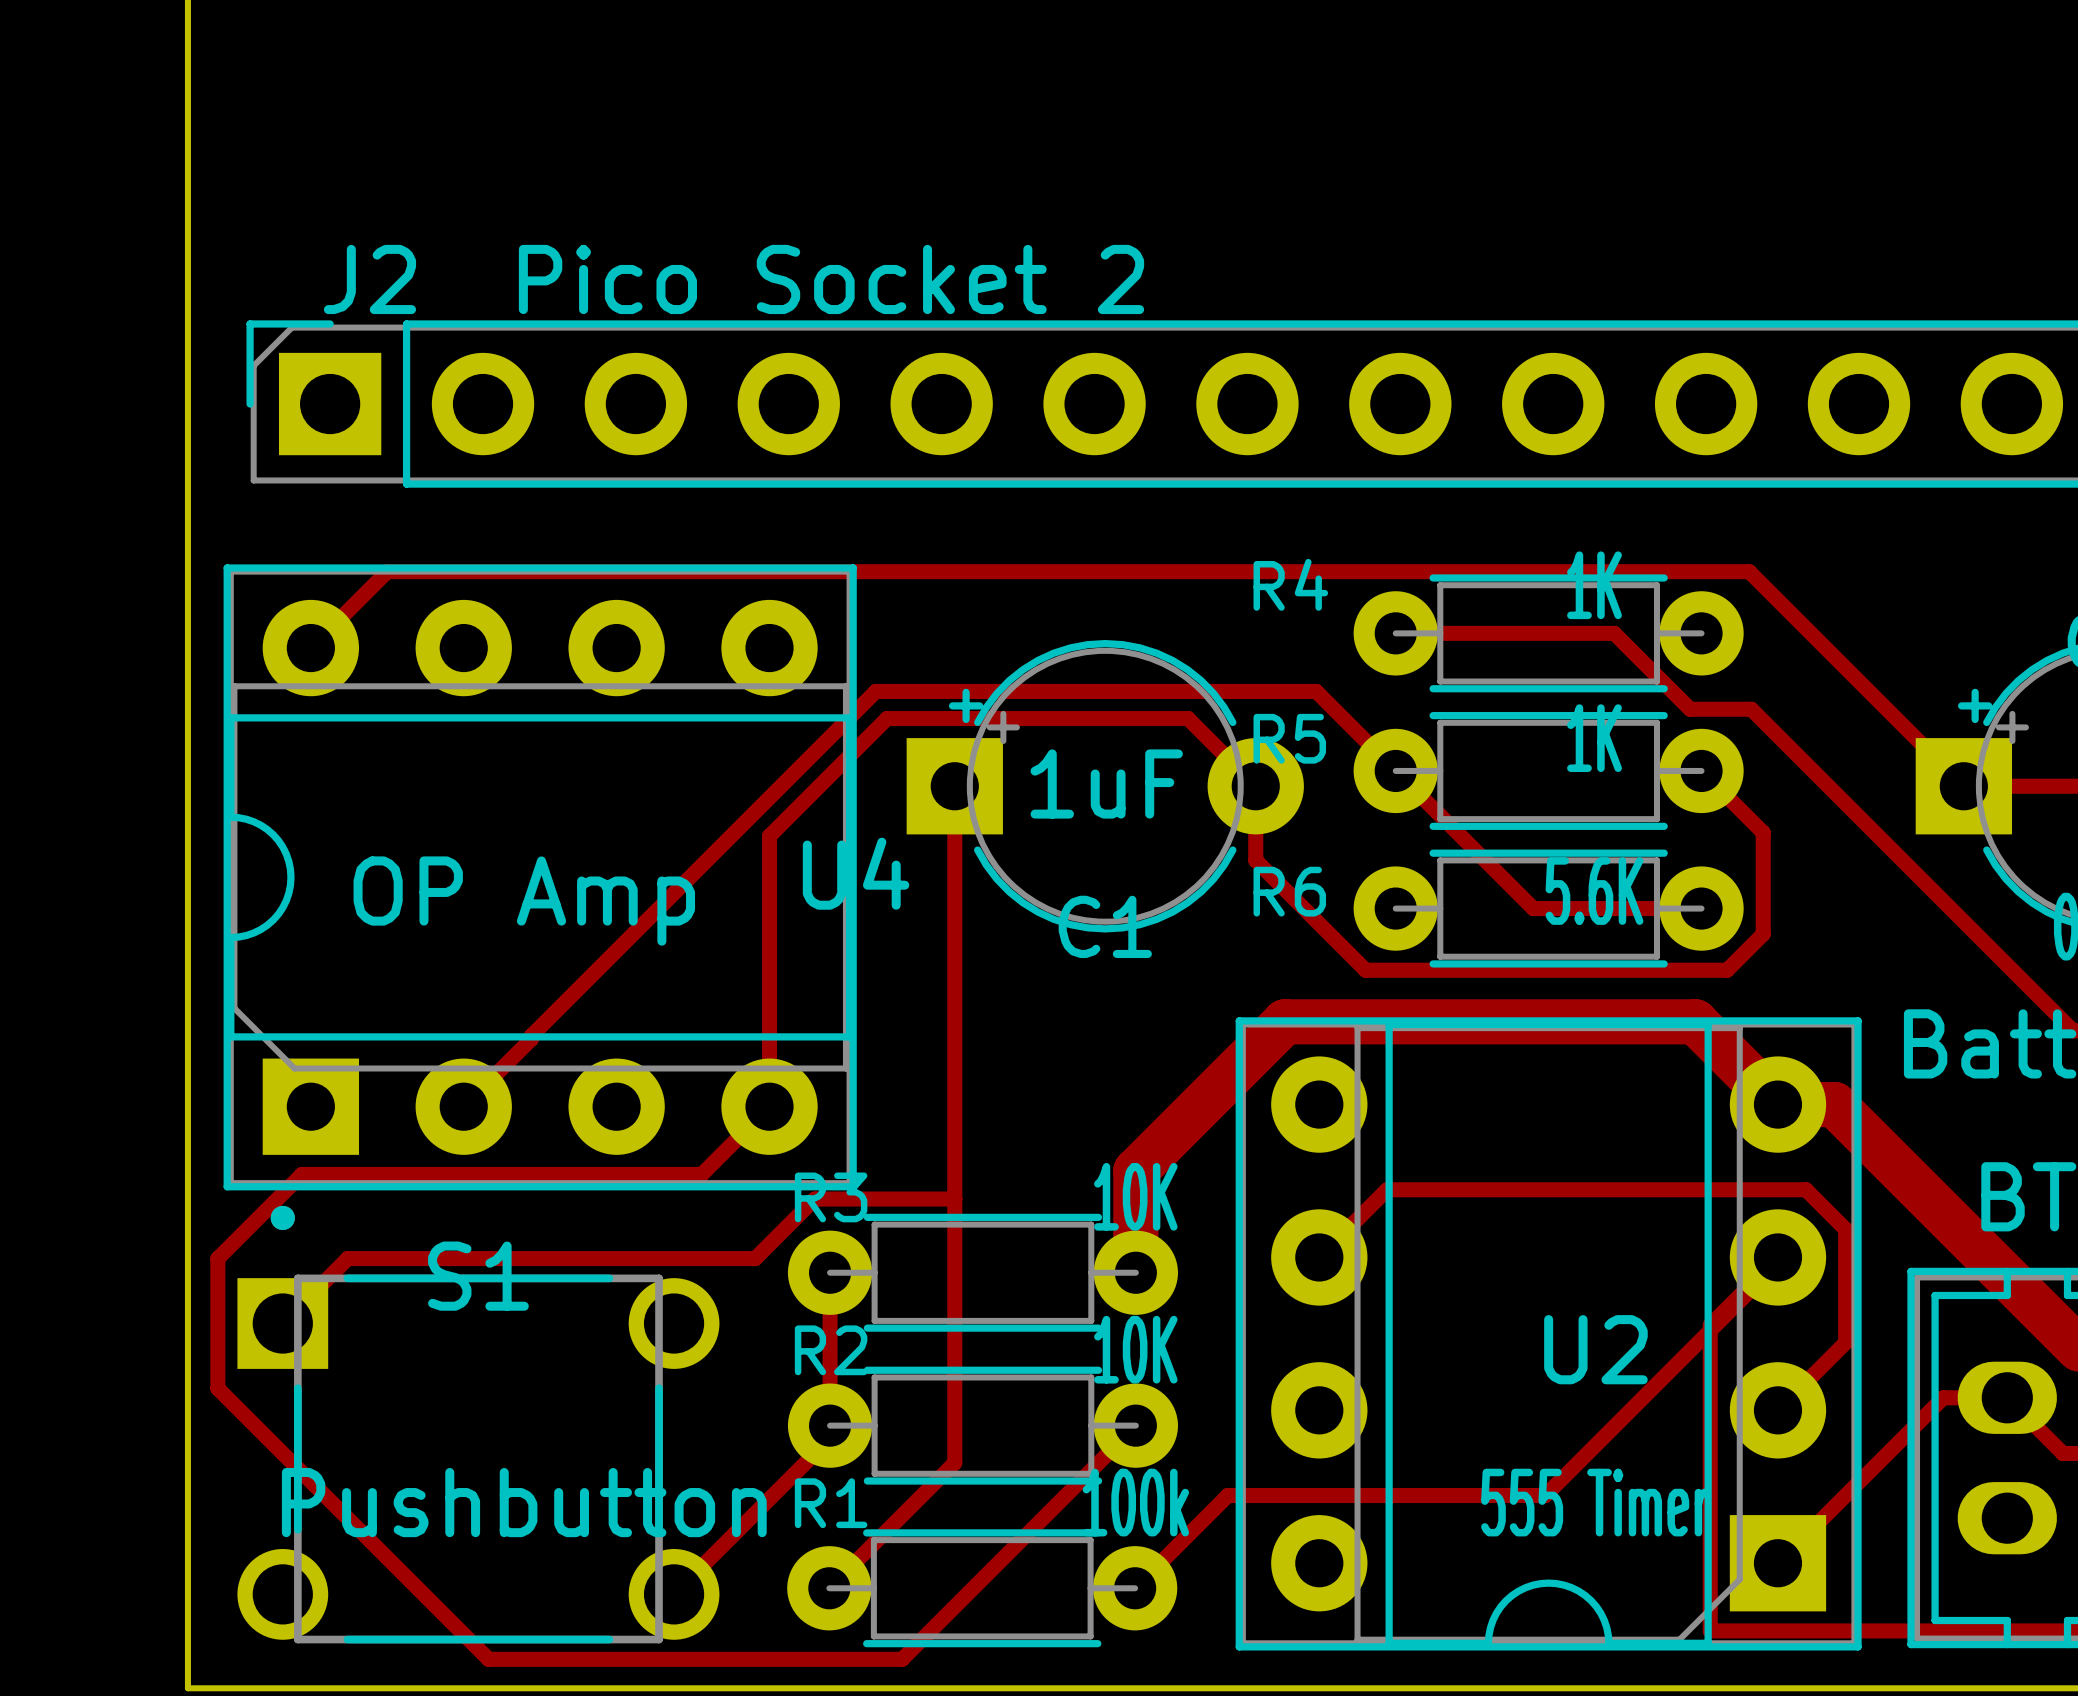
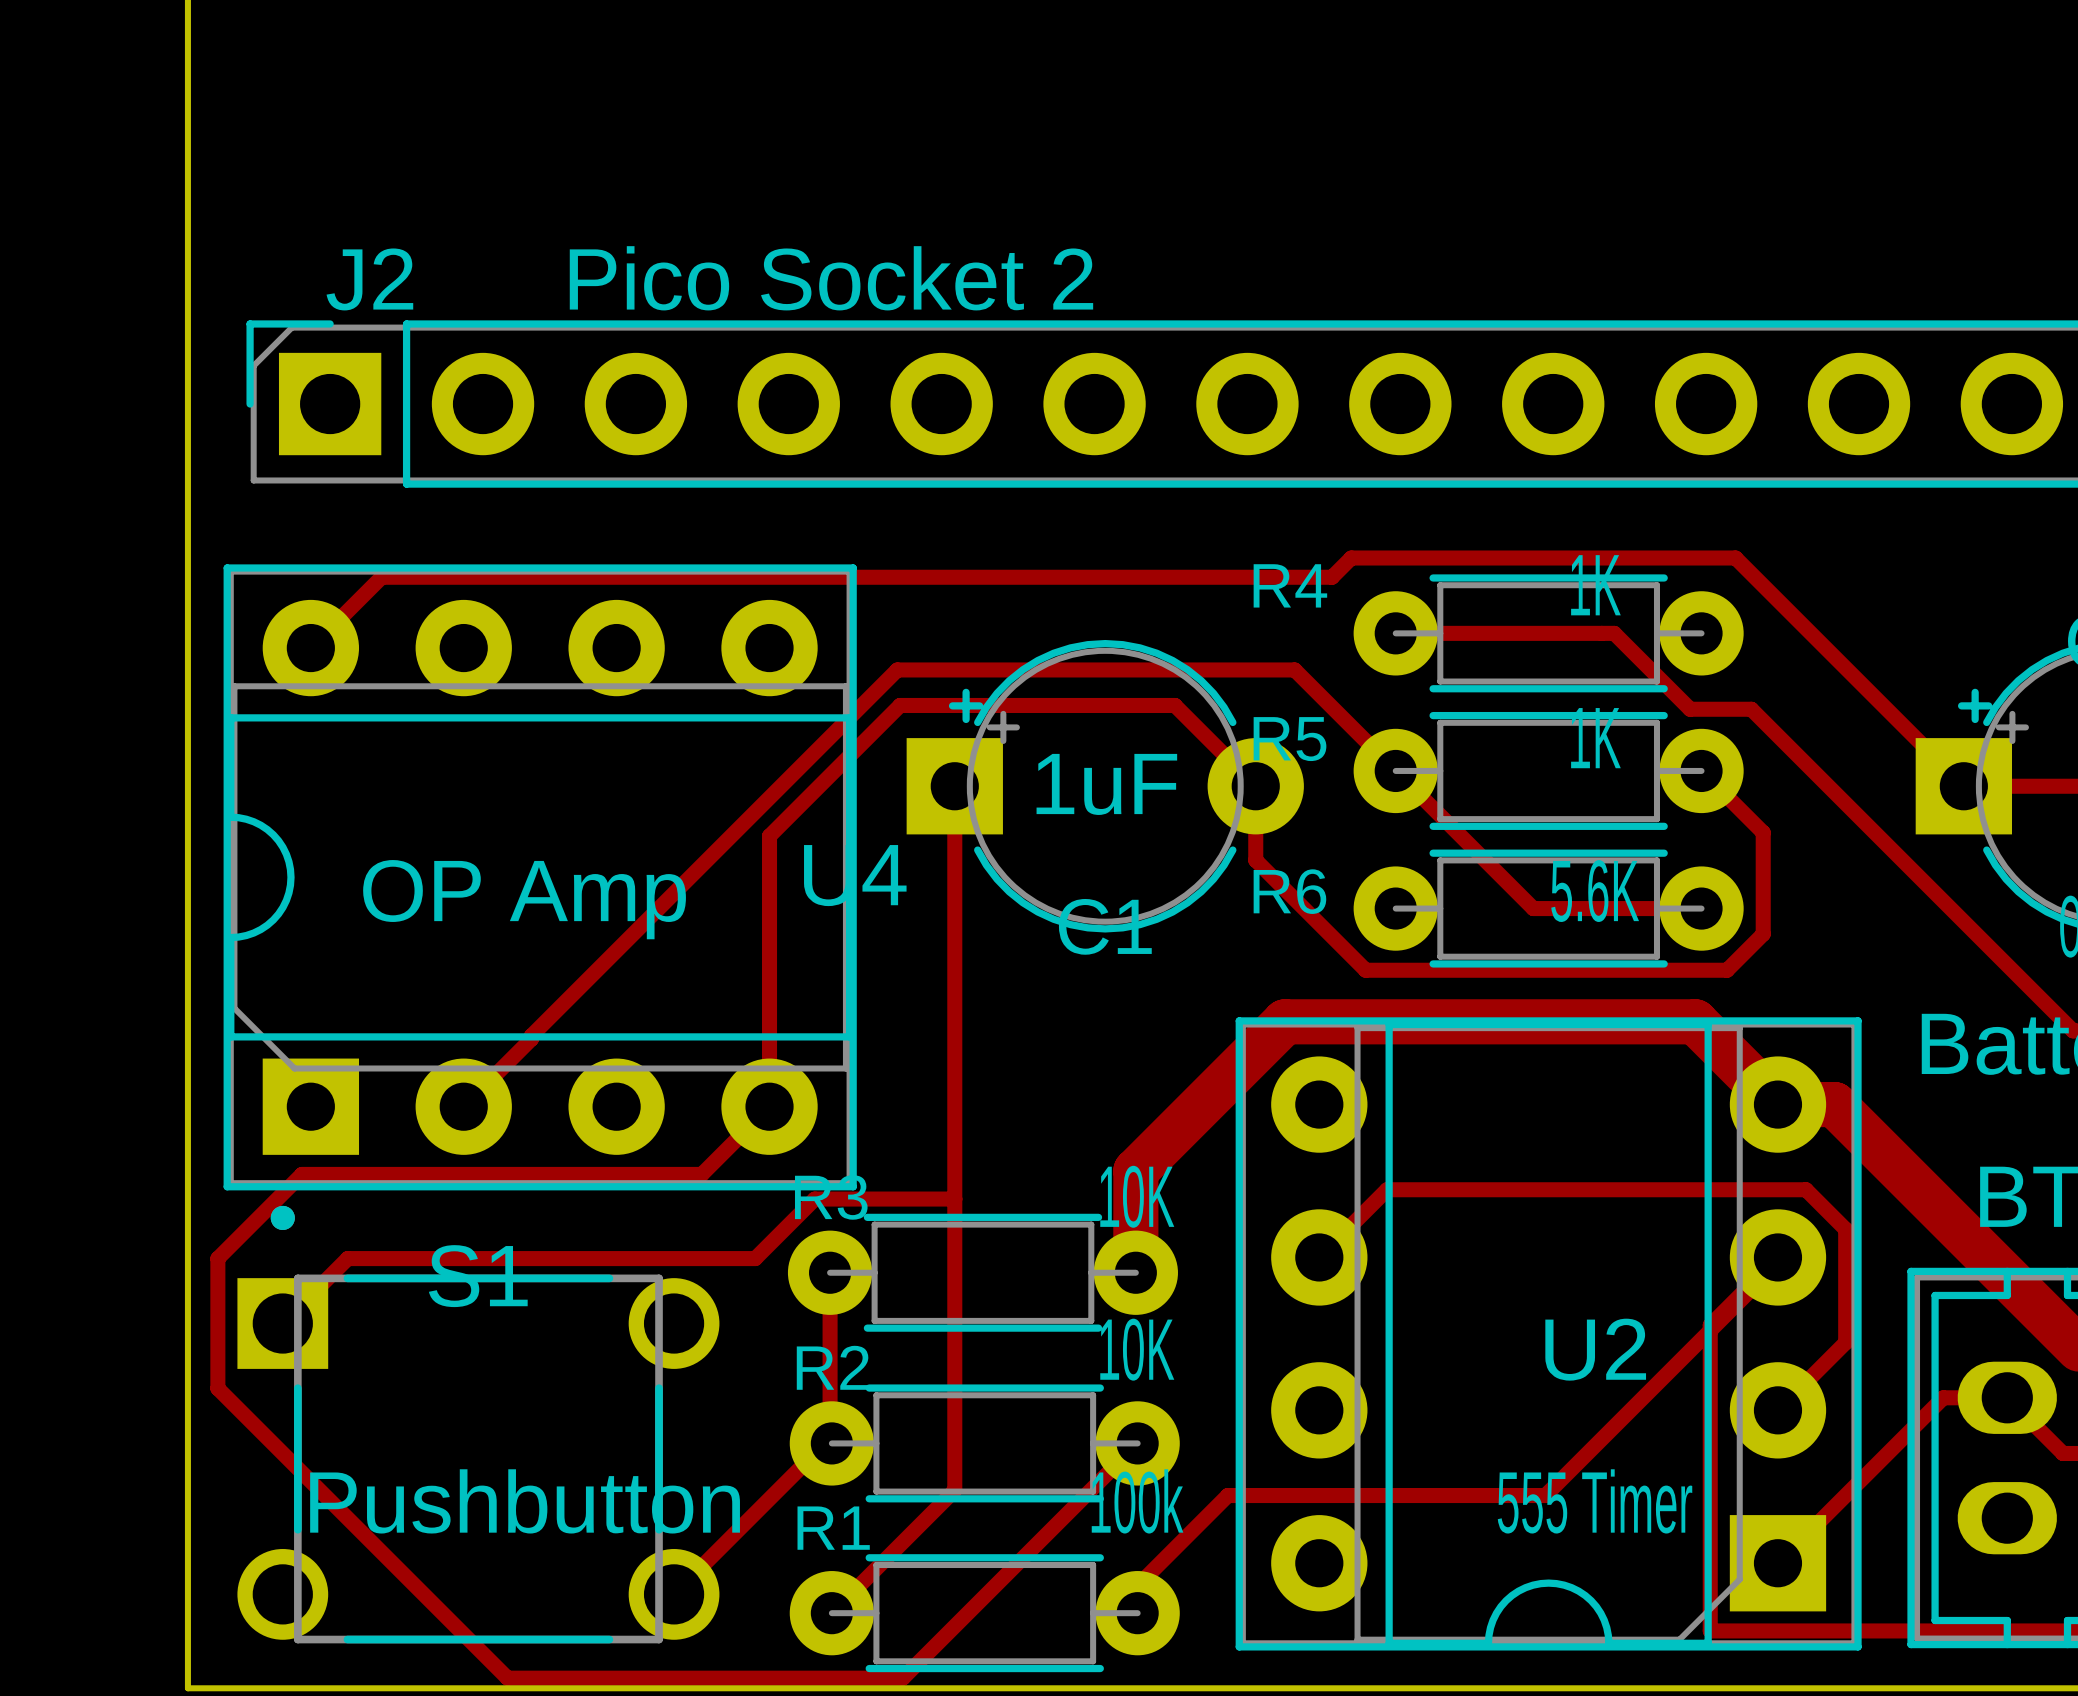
track: (1749, 571) (387, 571) (381, 577) -> (1749, 571) (1735, 558) (1351, 558) (1332, 577) (381, 577)
track: (875, 691) (1316, 691) -> (875, 691) (897, 669) (1294, 669) (1316, 691)
track: (887, 718) (1188, 718) -> (887, 718) (900, 705) (1174, 705) (1188, 718)
R2 position: (982, 1425) -> (984, 1443)
track: (1135, 1425) (902, 1659) (488, 1659) -> (1137, 1443) (902, 1678) (507, 1678) (488, 1659)
track: (954, 1462) (829, 1588) -> (954, 1462) (954, 1490) (831, 1613)
R1 position: (982, 1588) -> (984, 1613)

